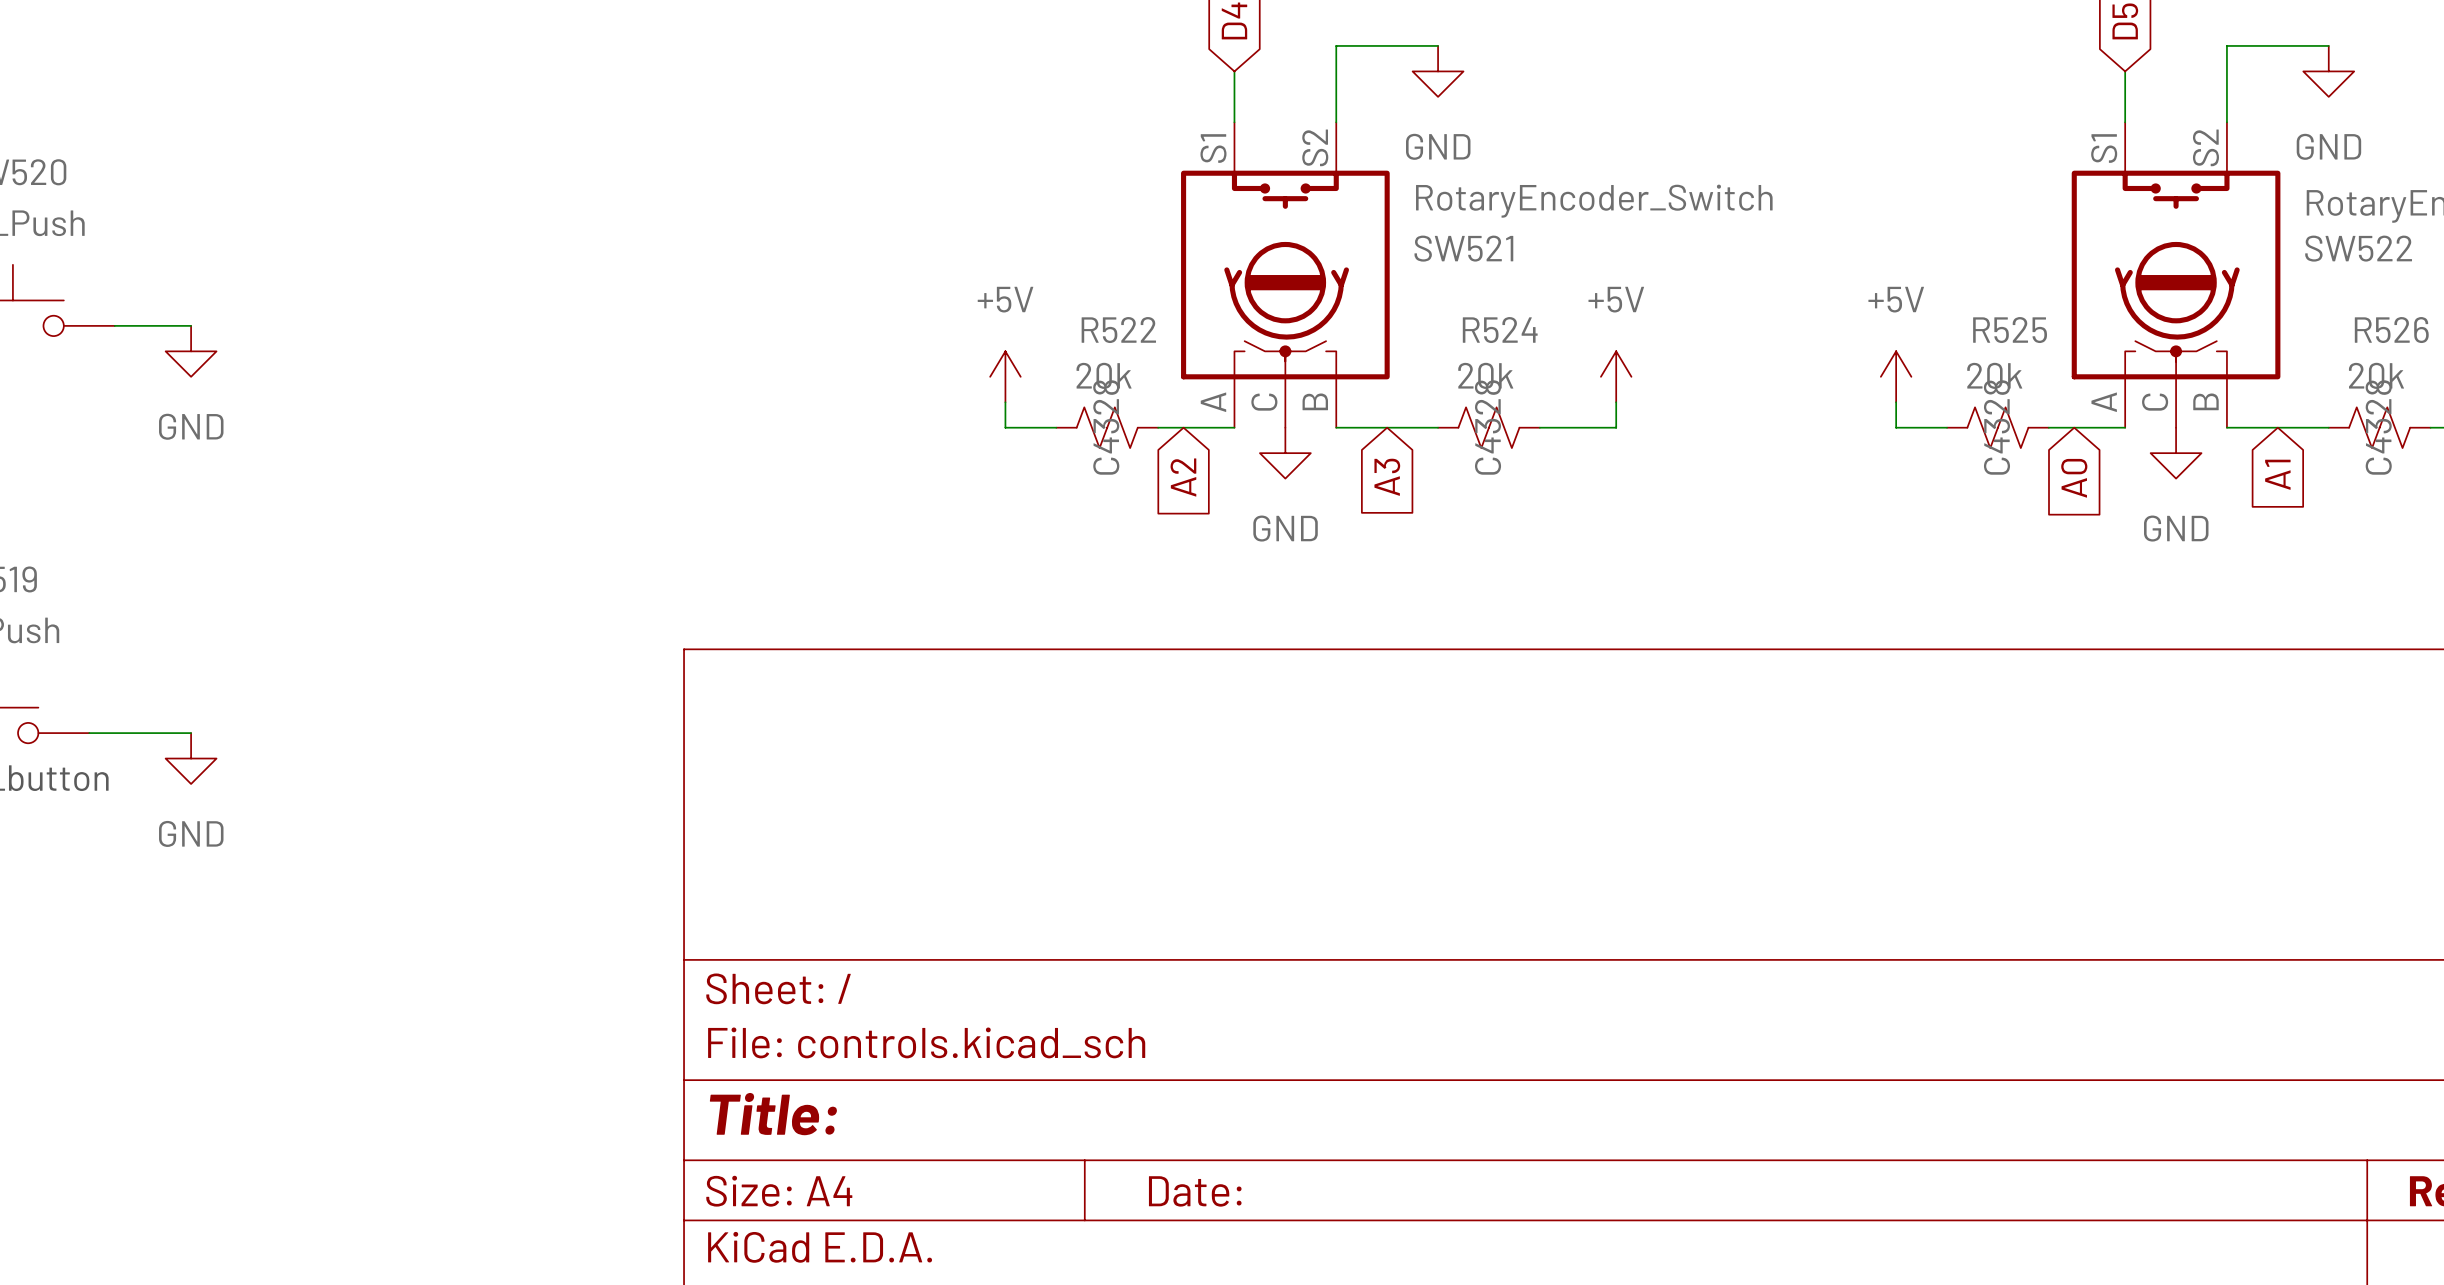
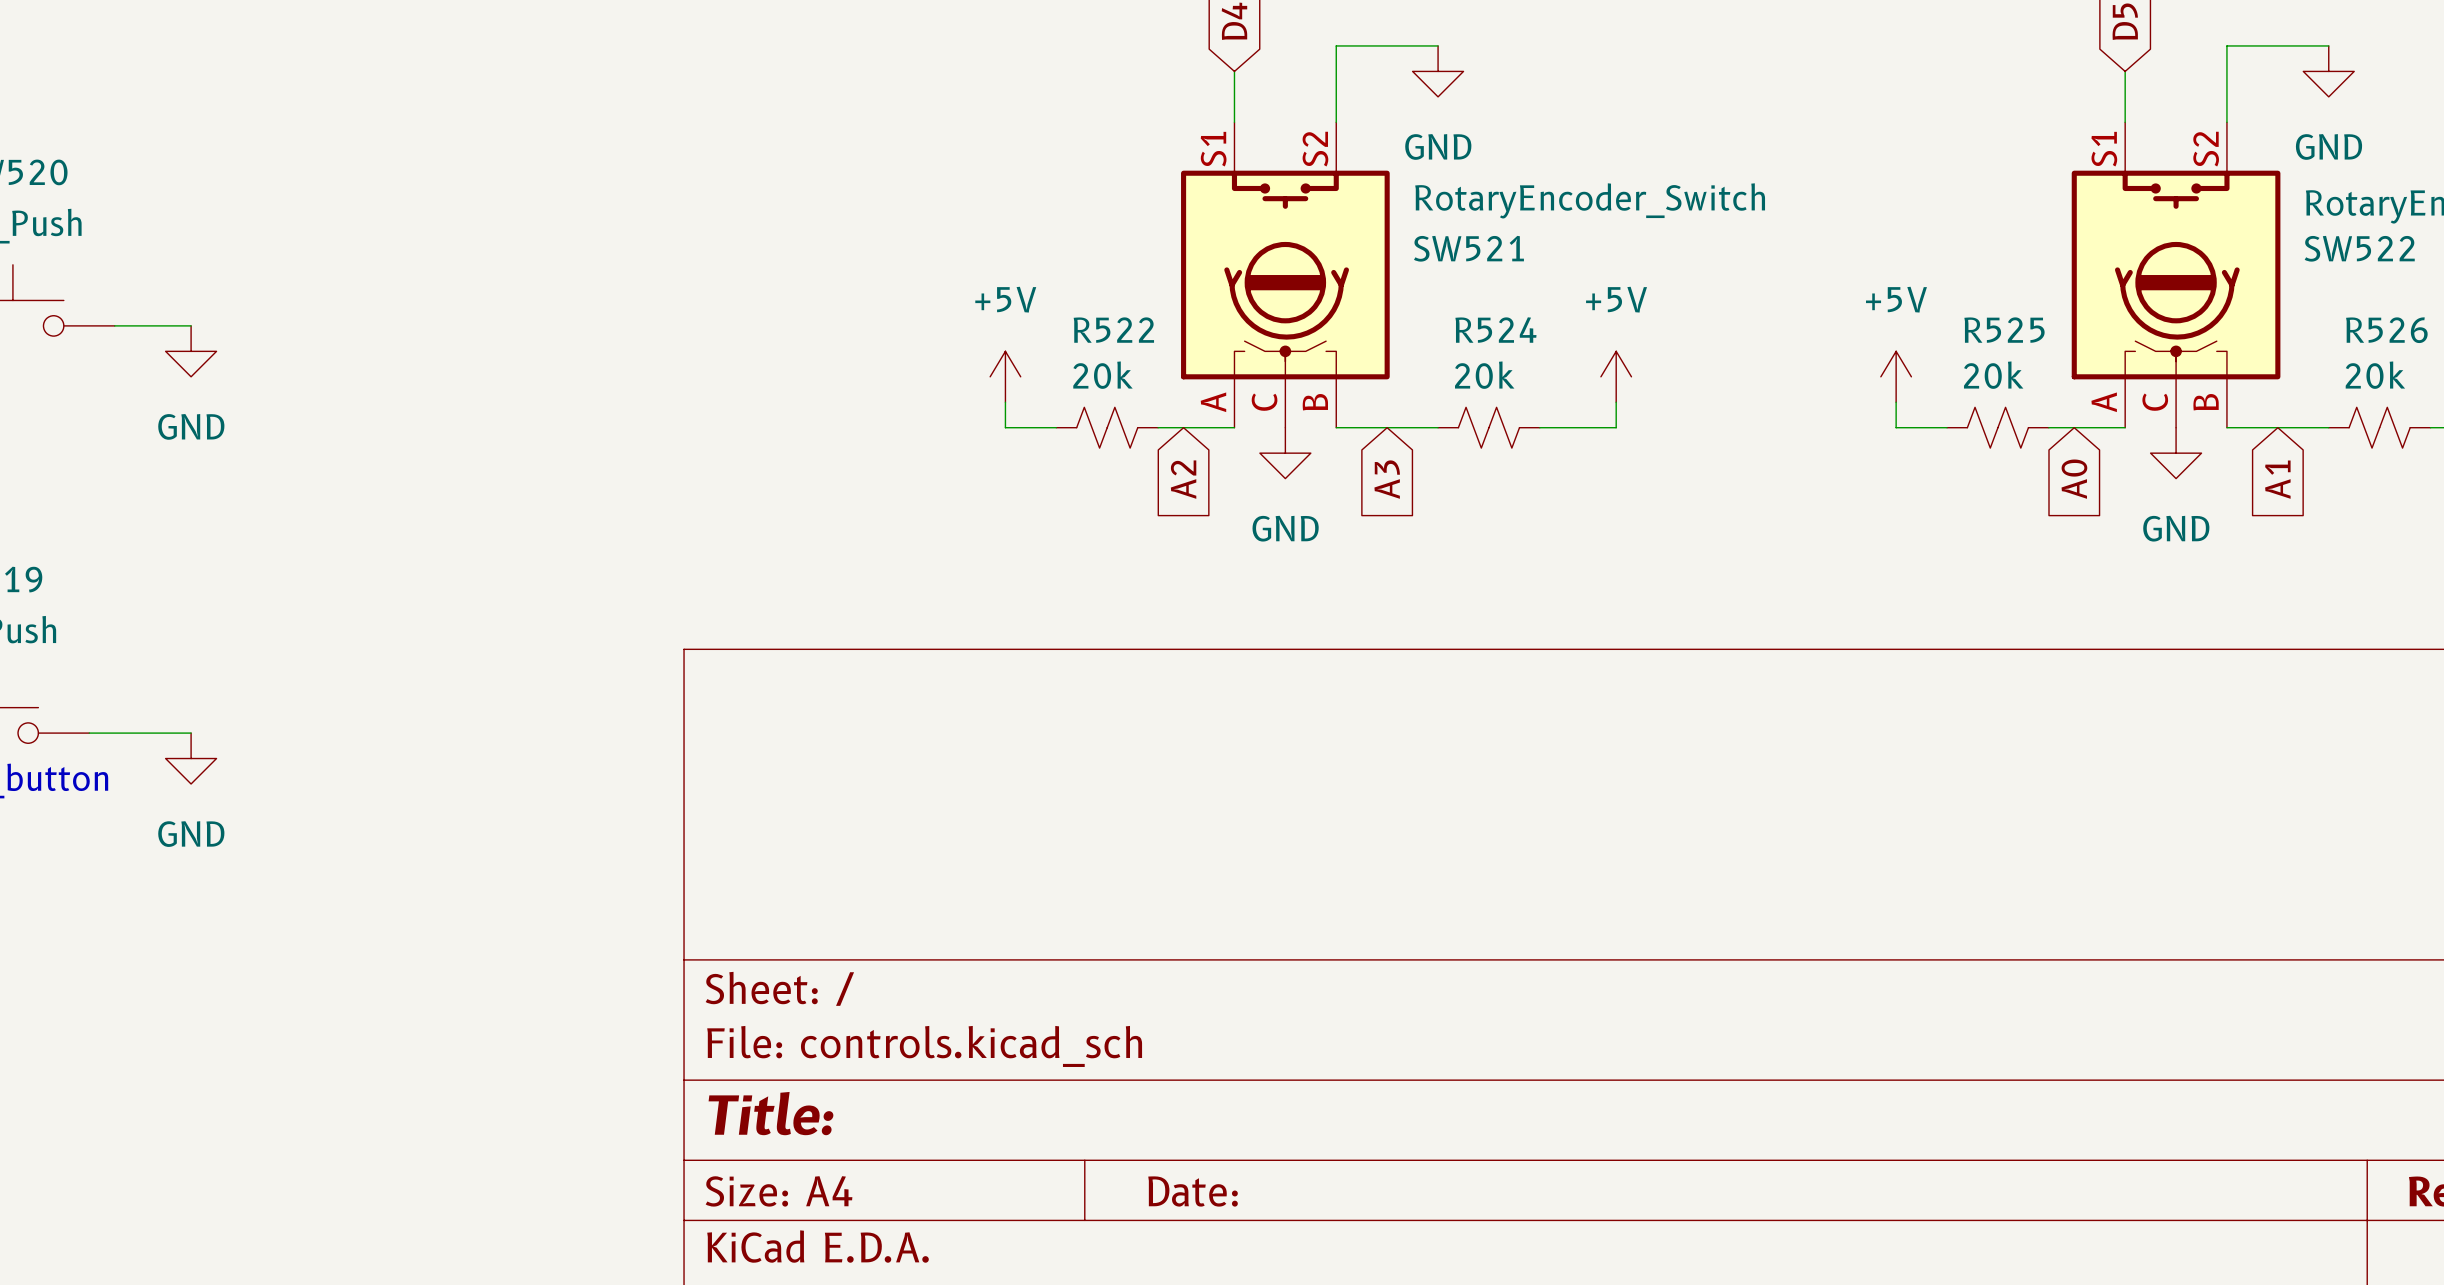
R522 text: C4328 (1106, 427) -> none
R524 text: C4328 (1487, 427) -> none
R525 text: C4328 (1996, 427) -> none
R526 text: C4328 (2378, 427) -> none

